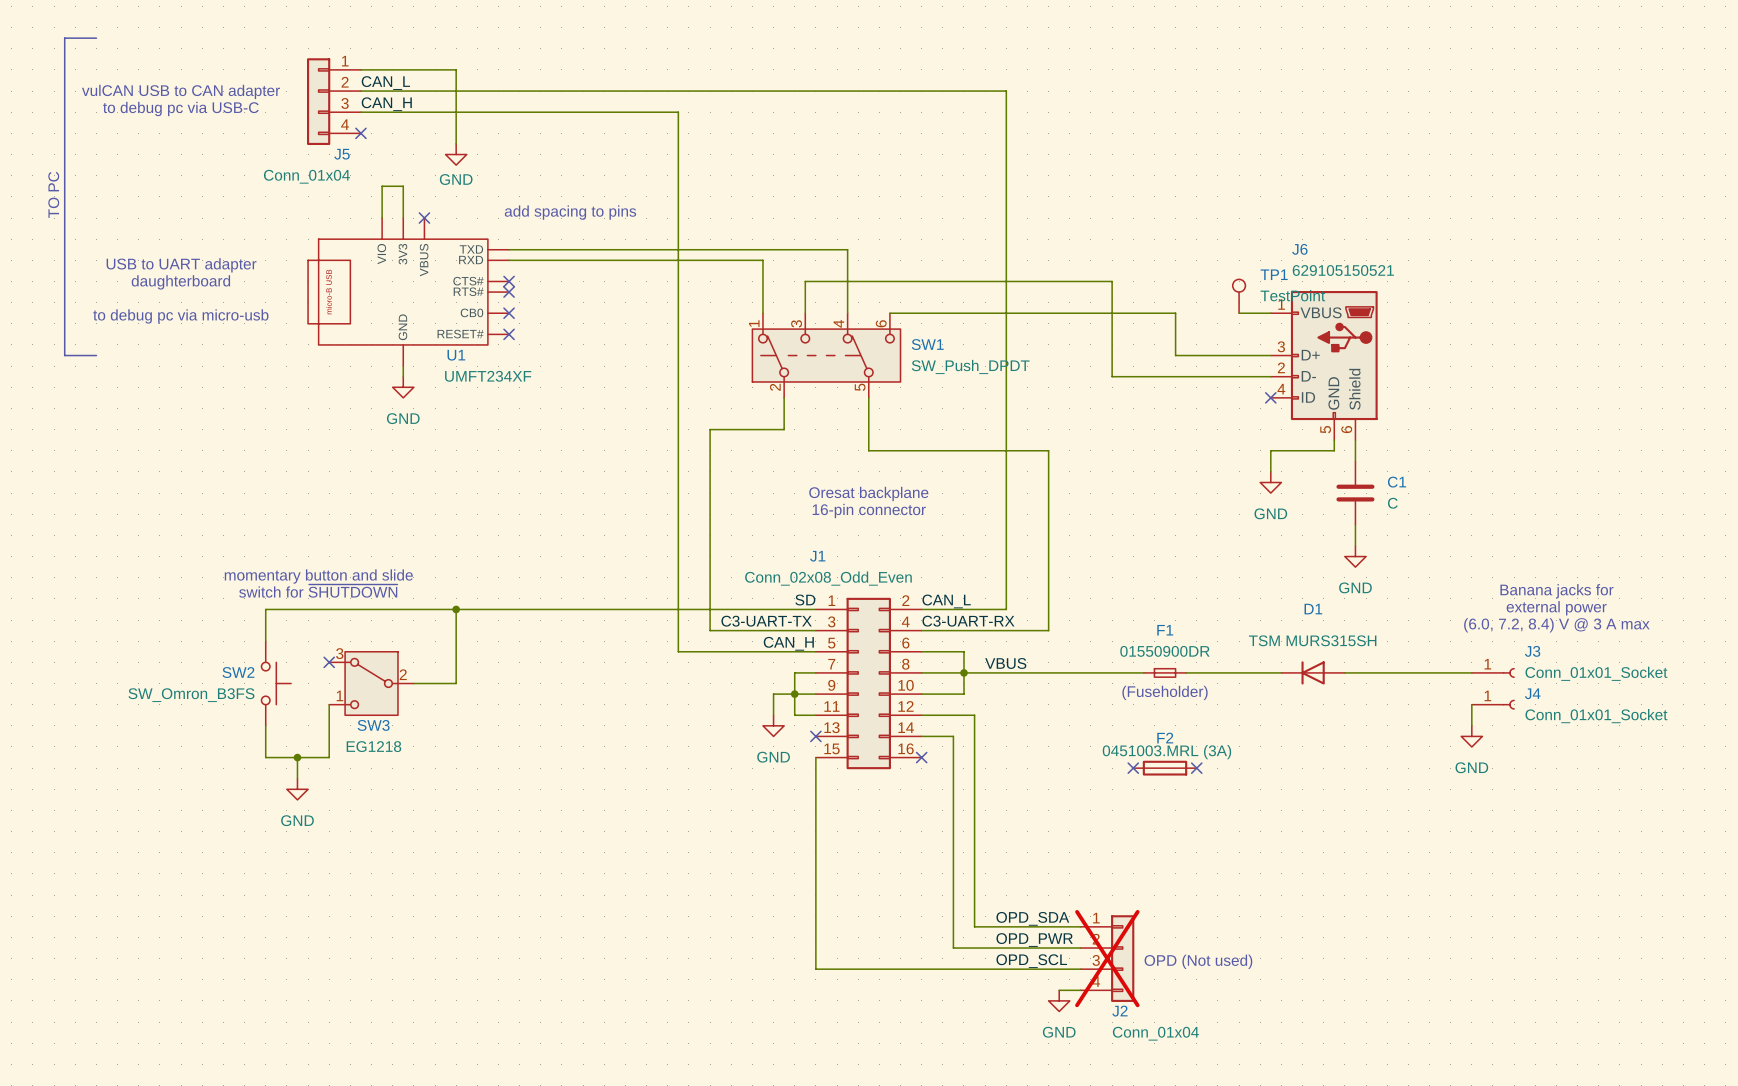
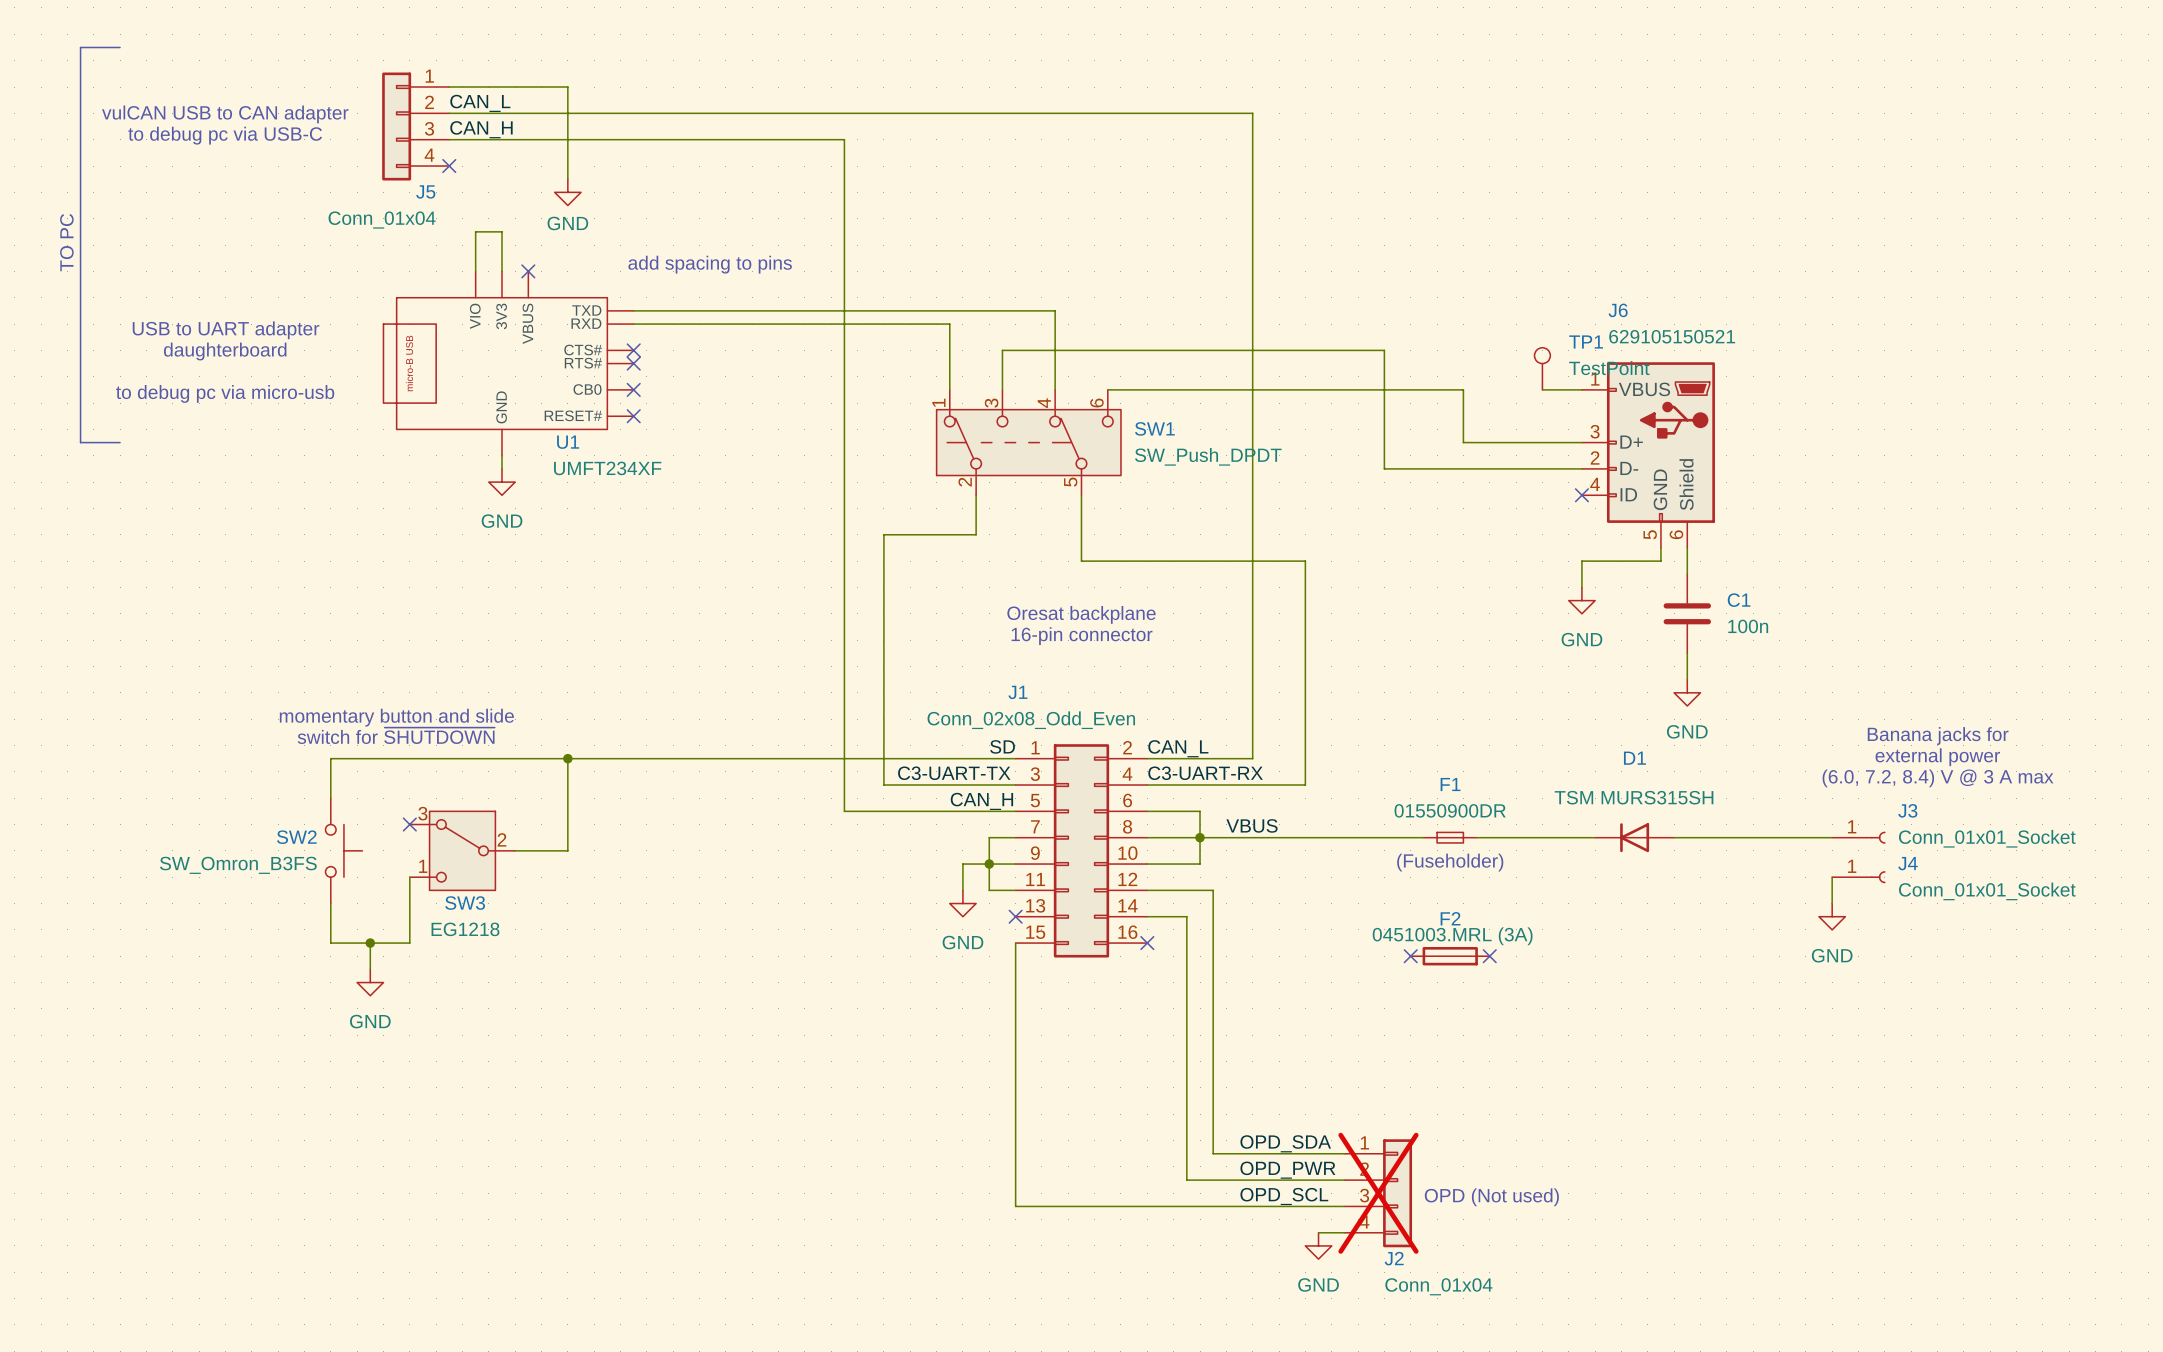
C1 value: C (1392, 503) -> 100n (1748, 626)

